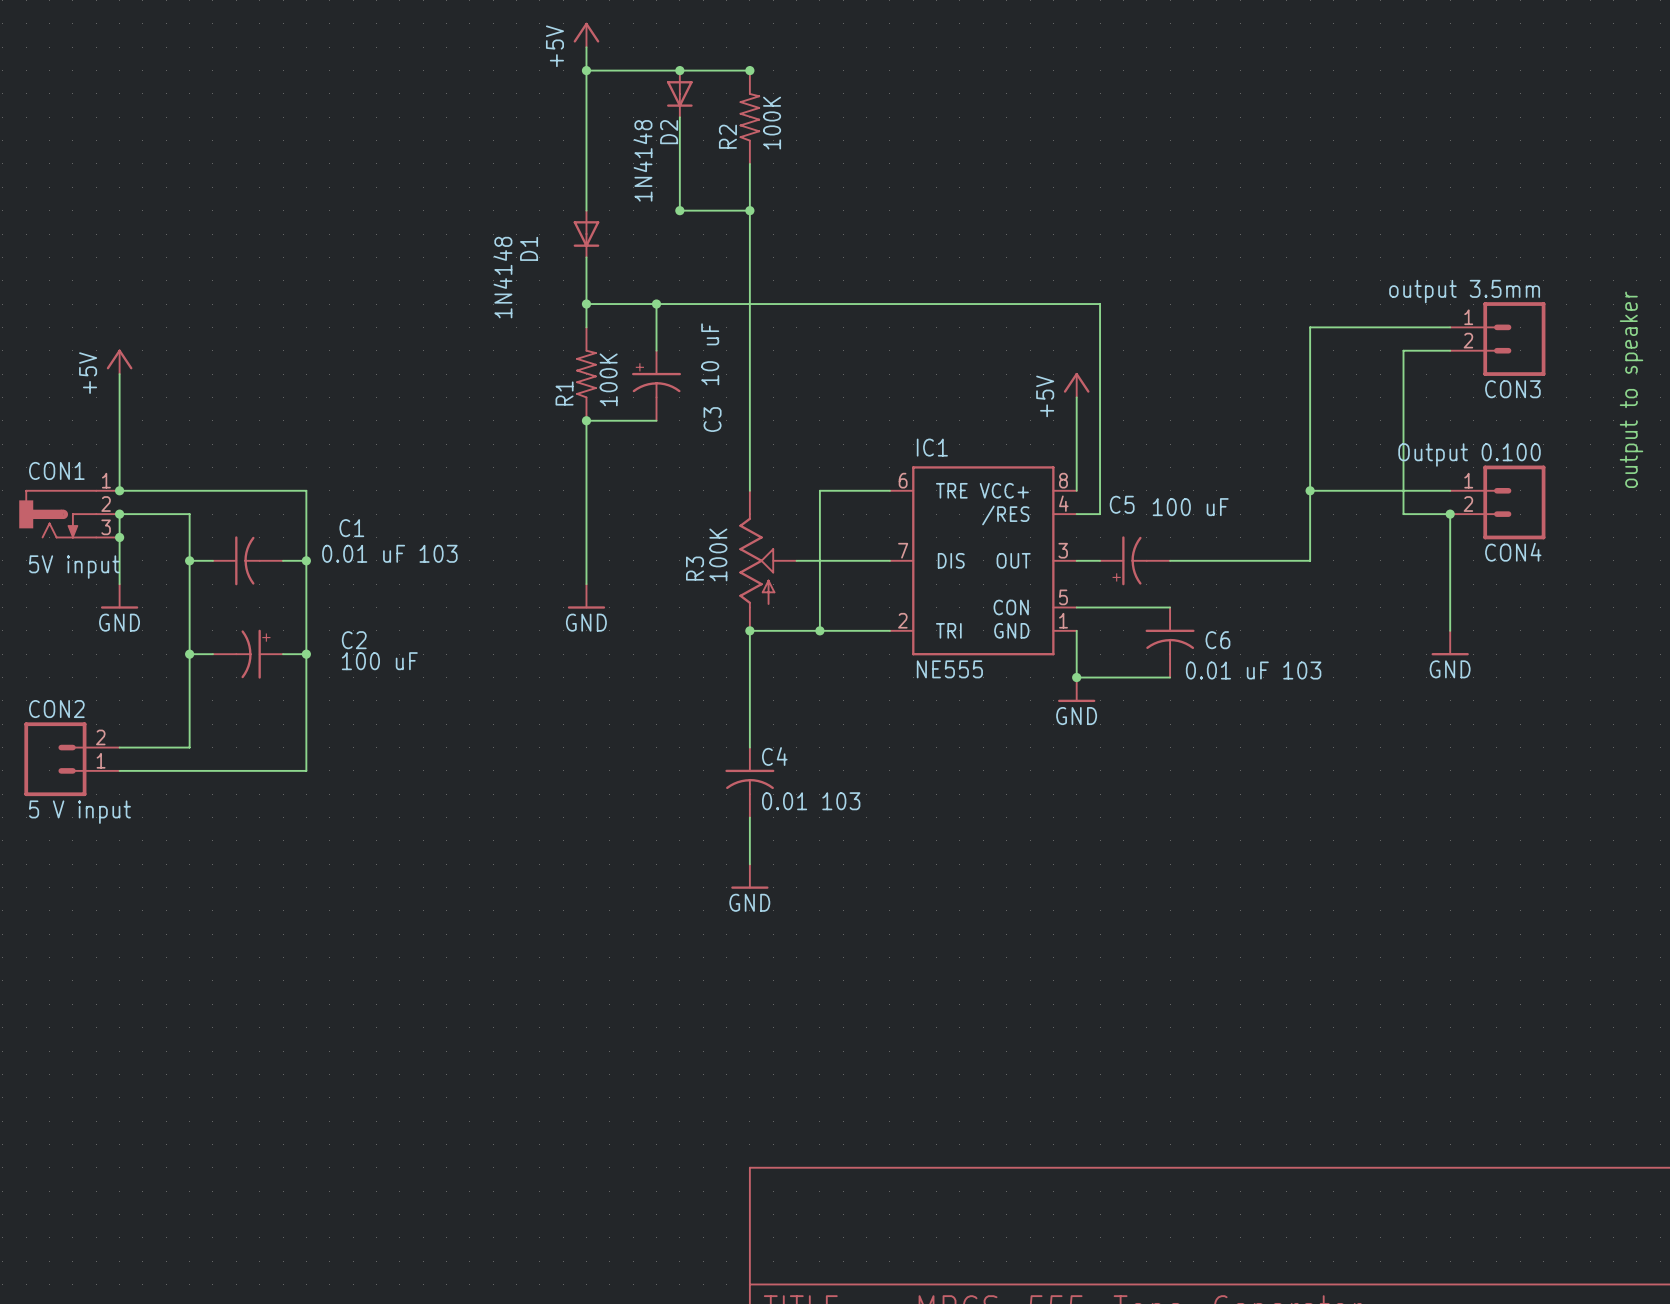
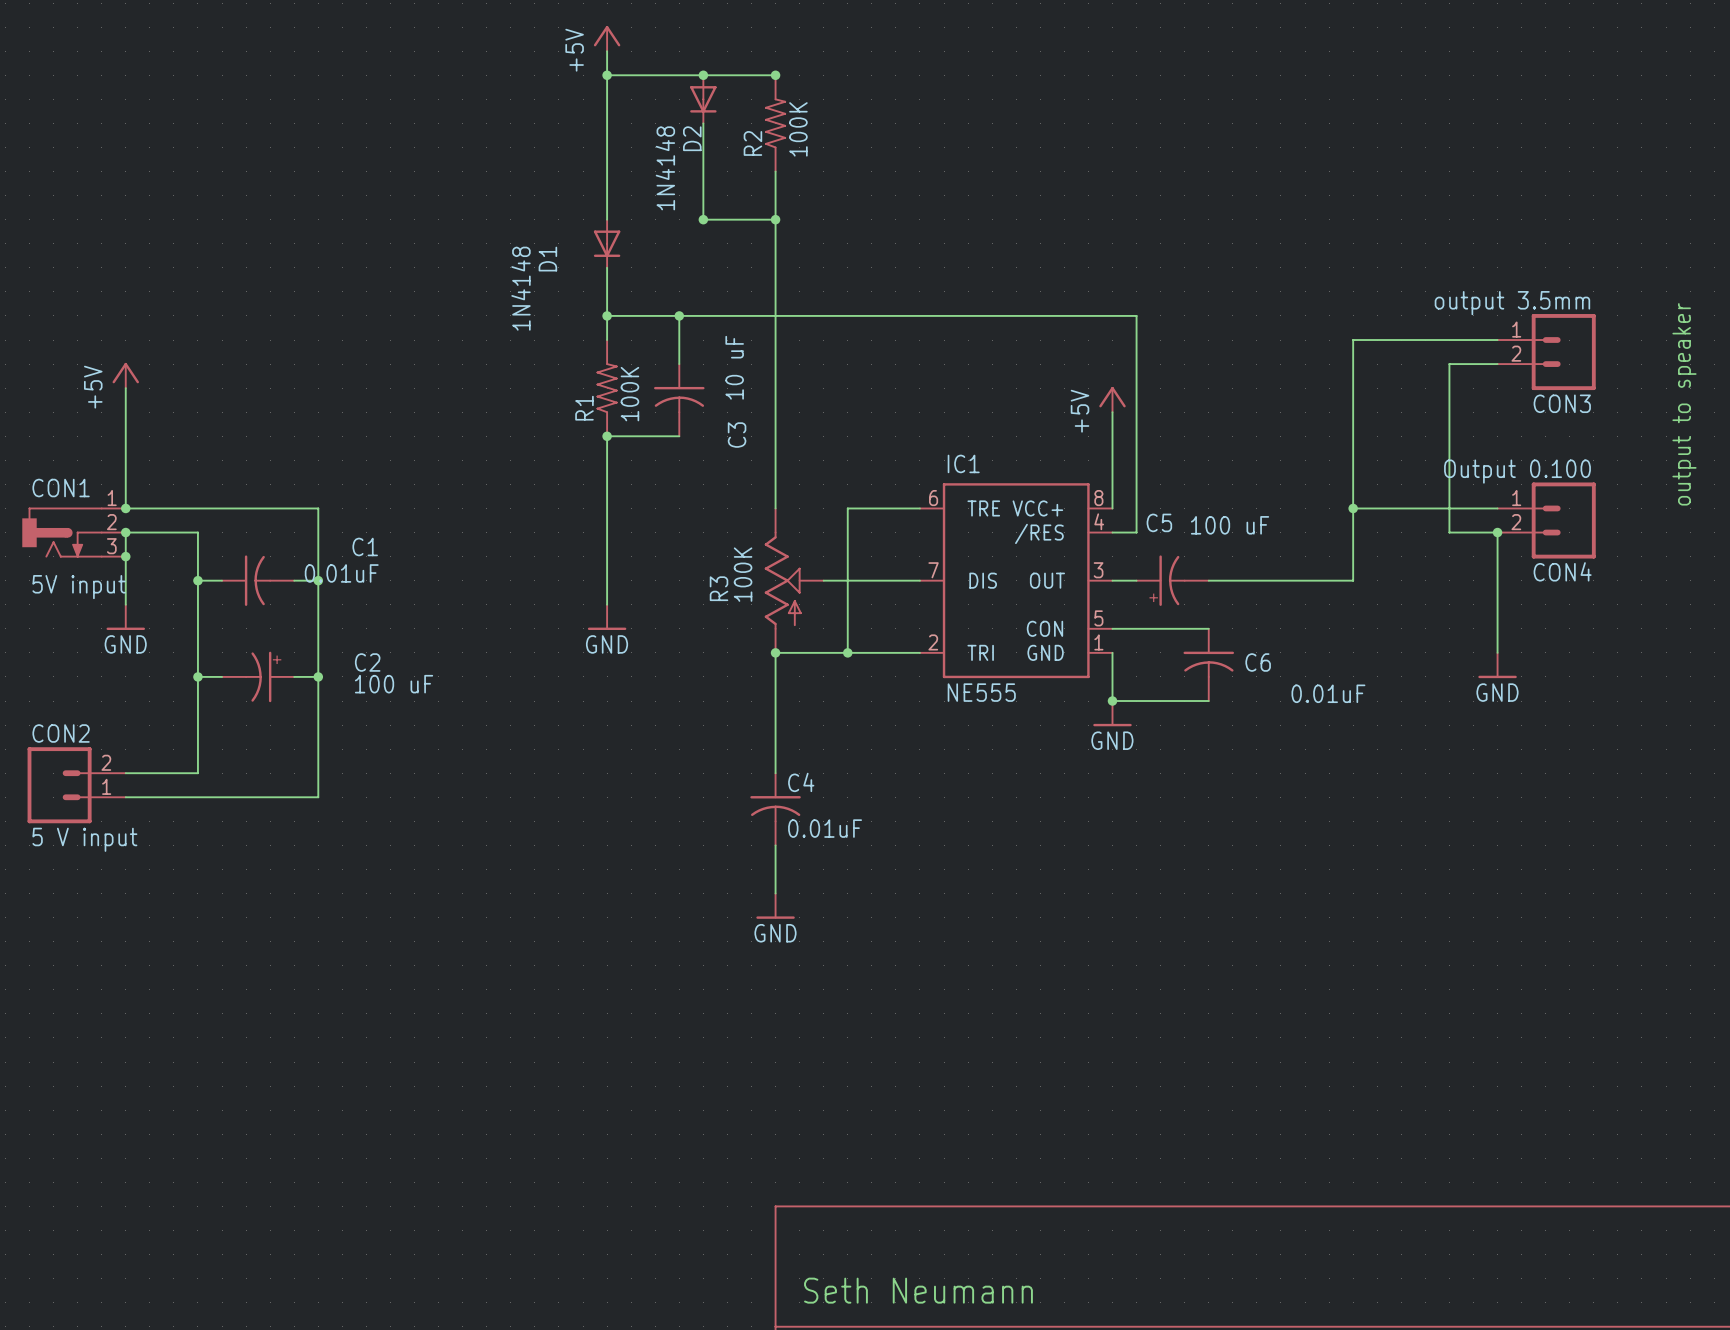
C3 symbol: [632, 350, 682, 421] -> [654, 364, 705, 437]
C1 value: 0.01 uF 103 (389, 553) -> 0.01uF (341, 573)
C6 value: 0.01 uF 103 (1253, 670) -> 0.01uF (1328, 693)
C4 value: 0.01 103 (811, 801) -> 0.01uF (825, 828)
text: none -> Seth Neumann (918, 1290)

